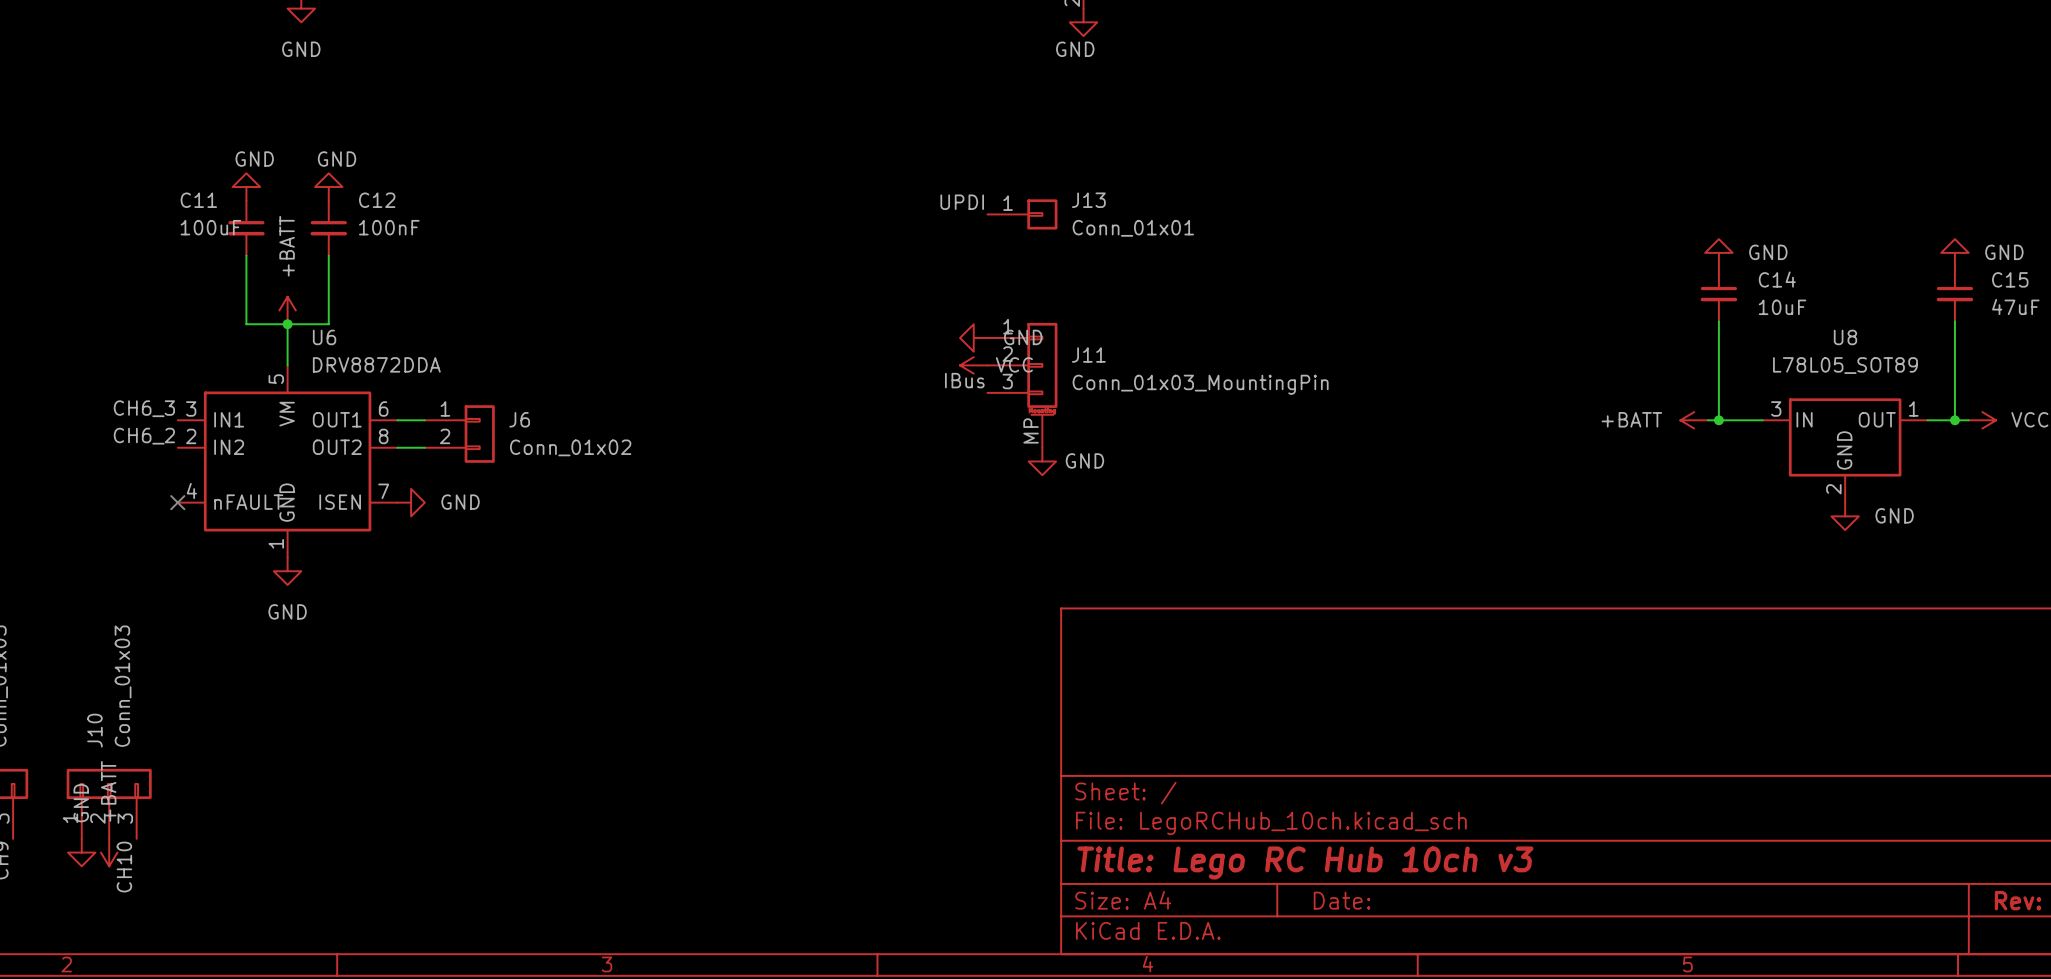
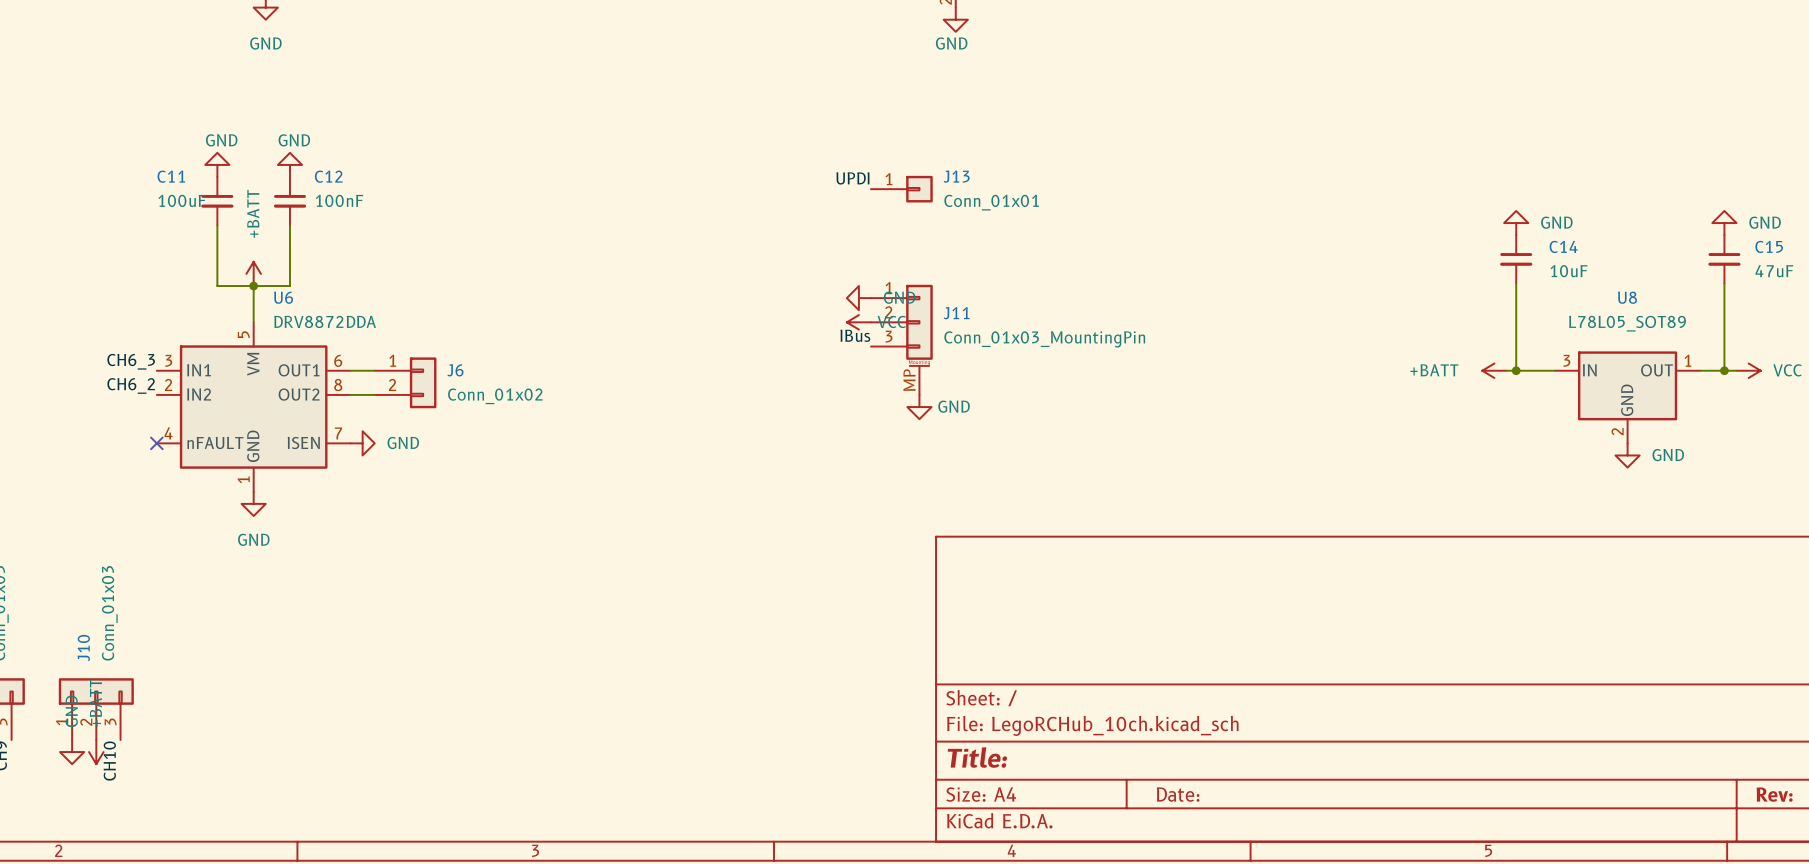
title block: Title: Lego RC Hub 10ch v3 (1305, 862) -> Title: (977, 757)

